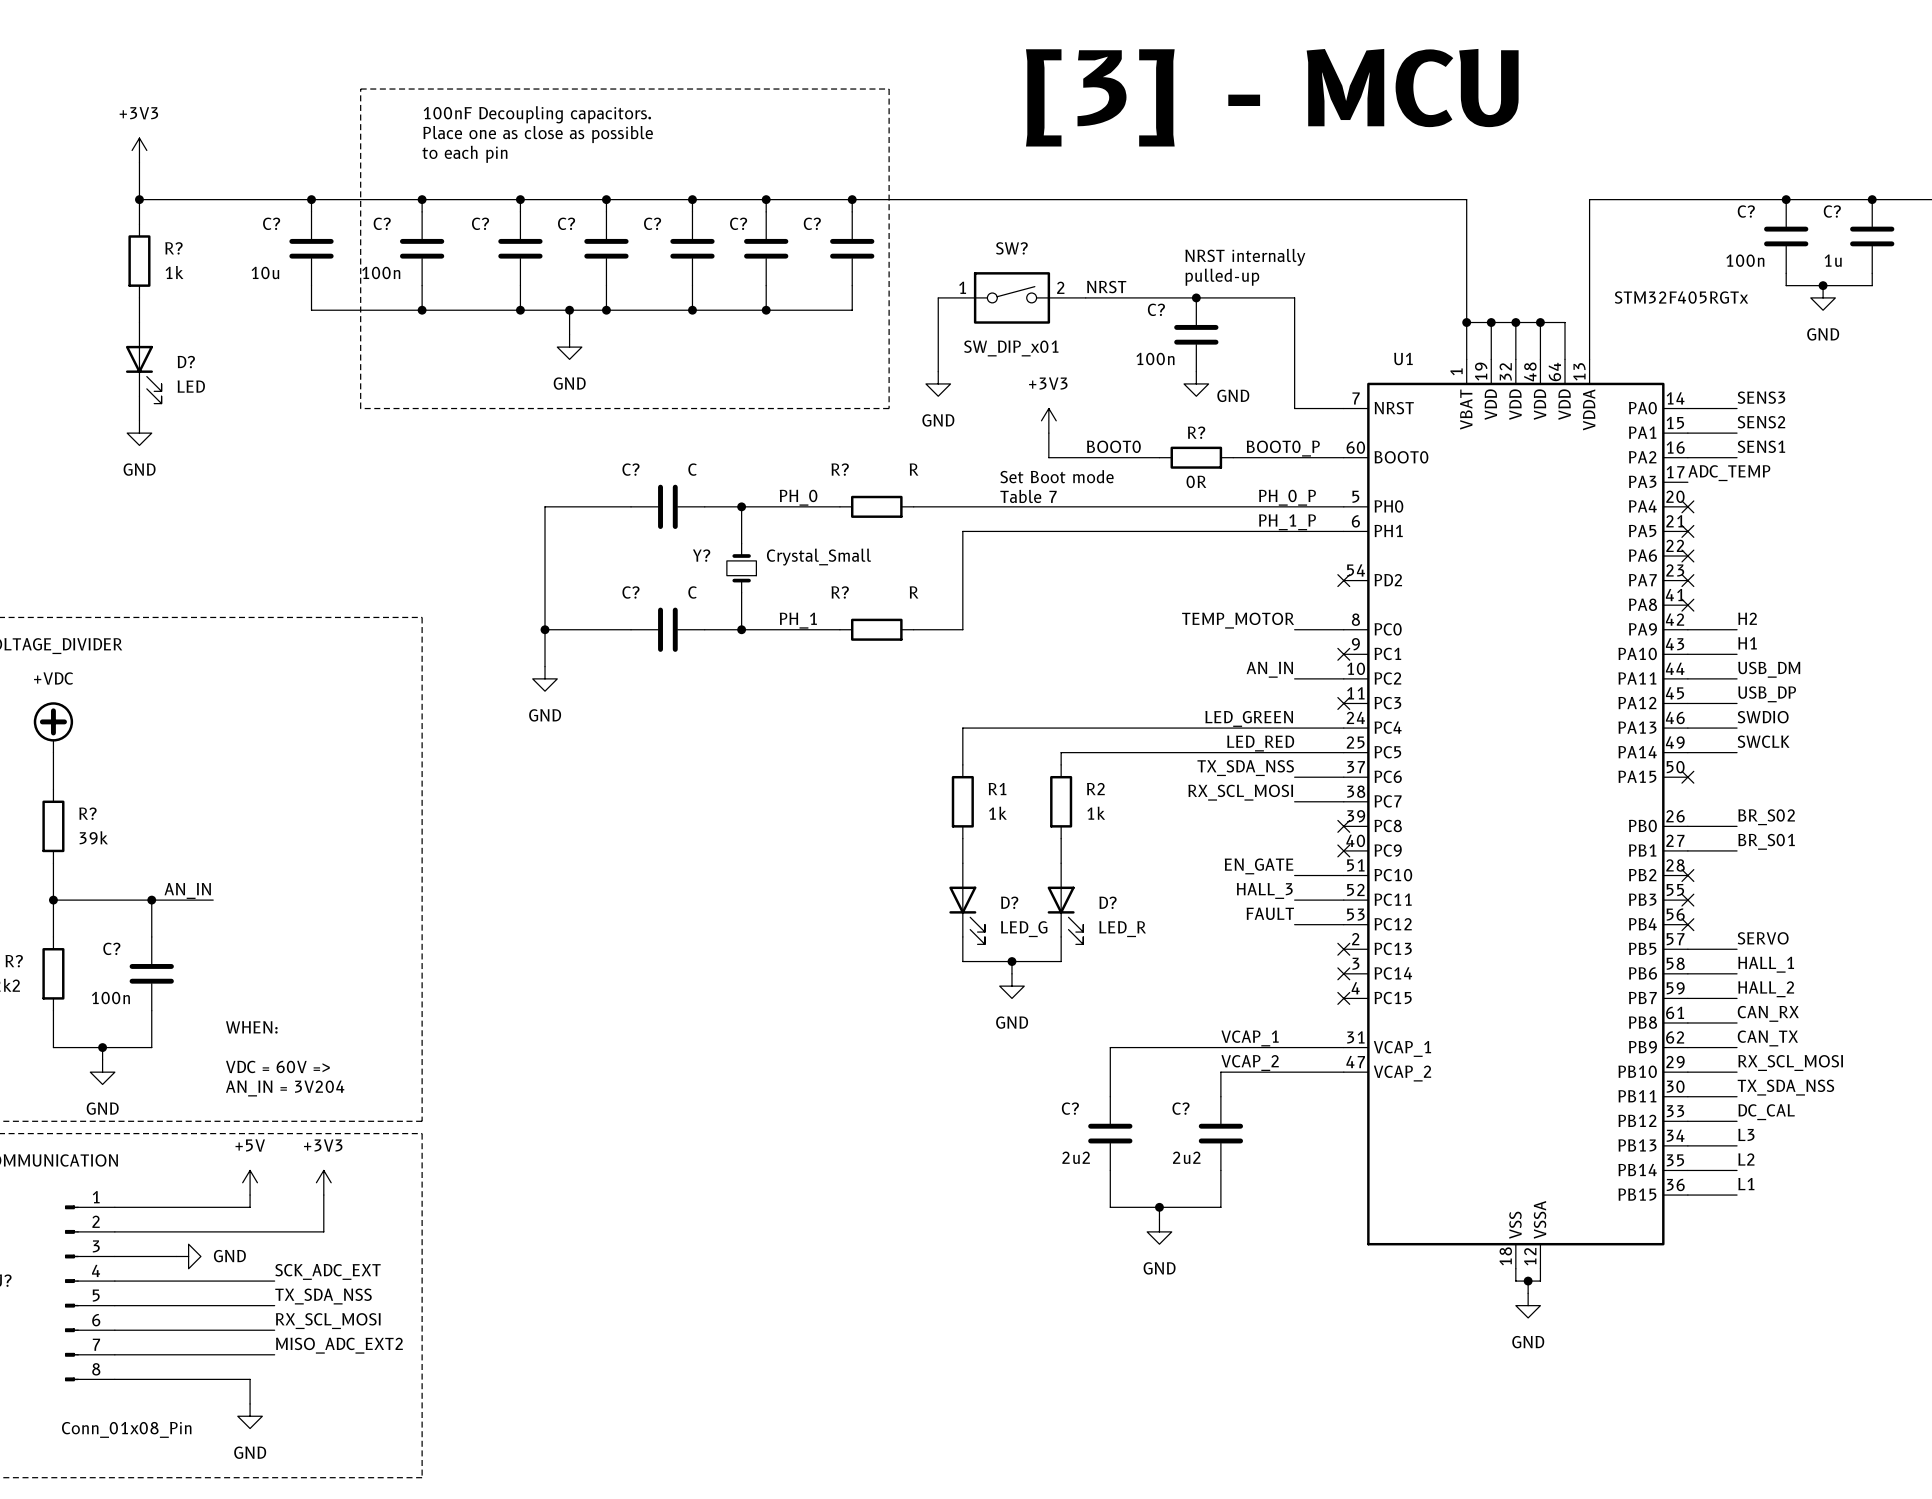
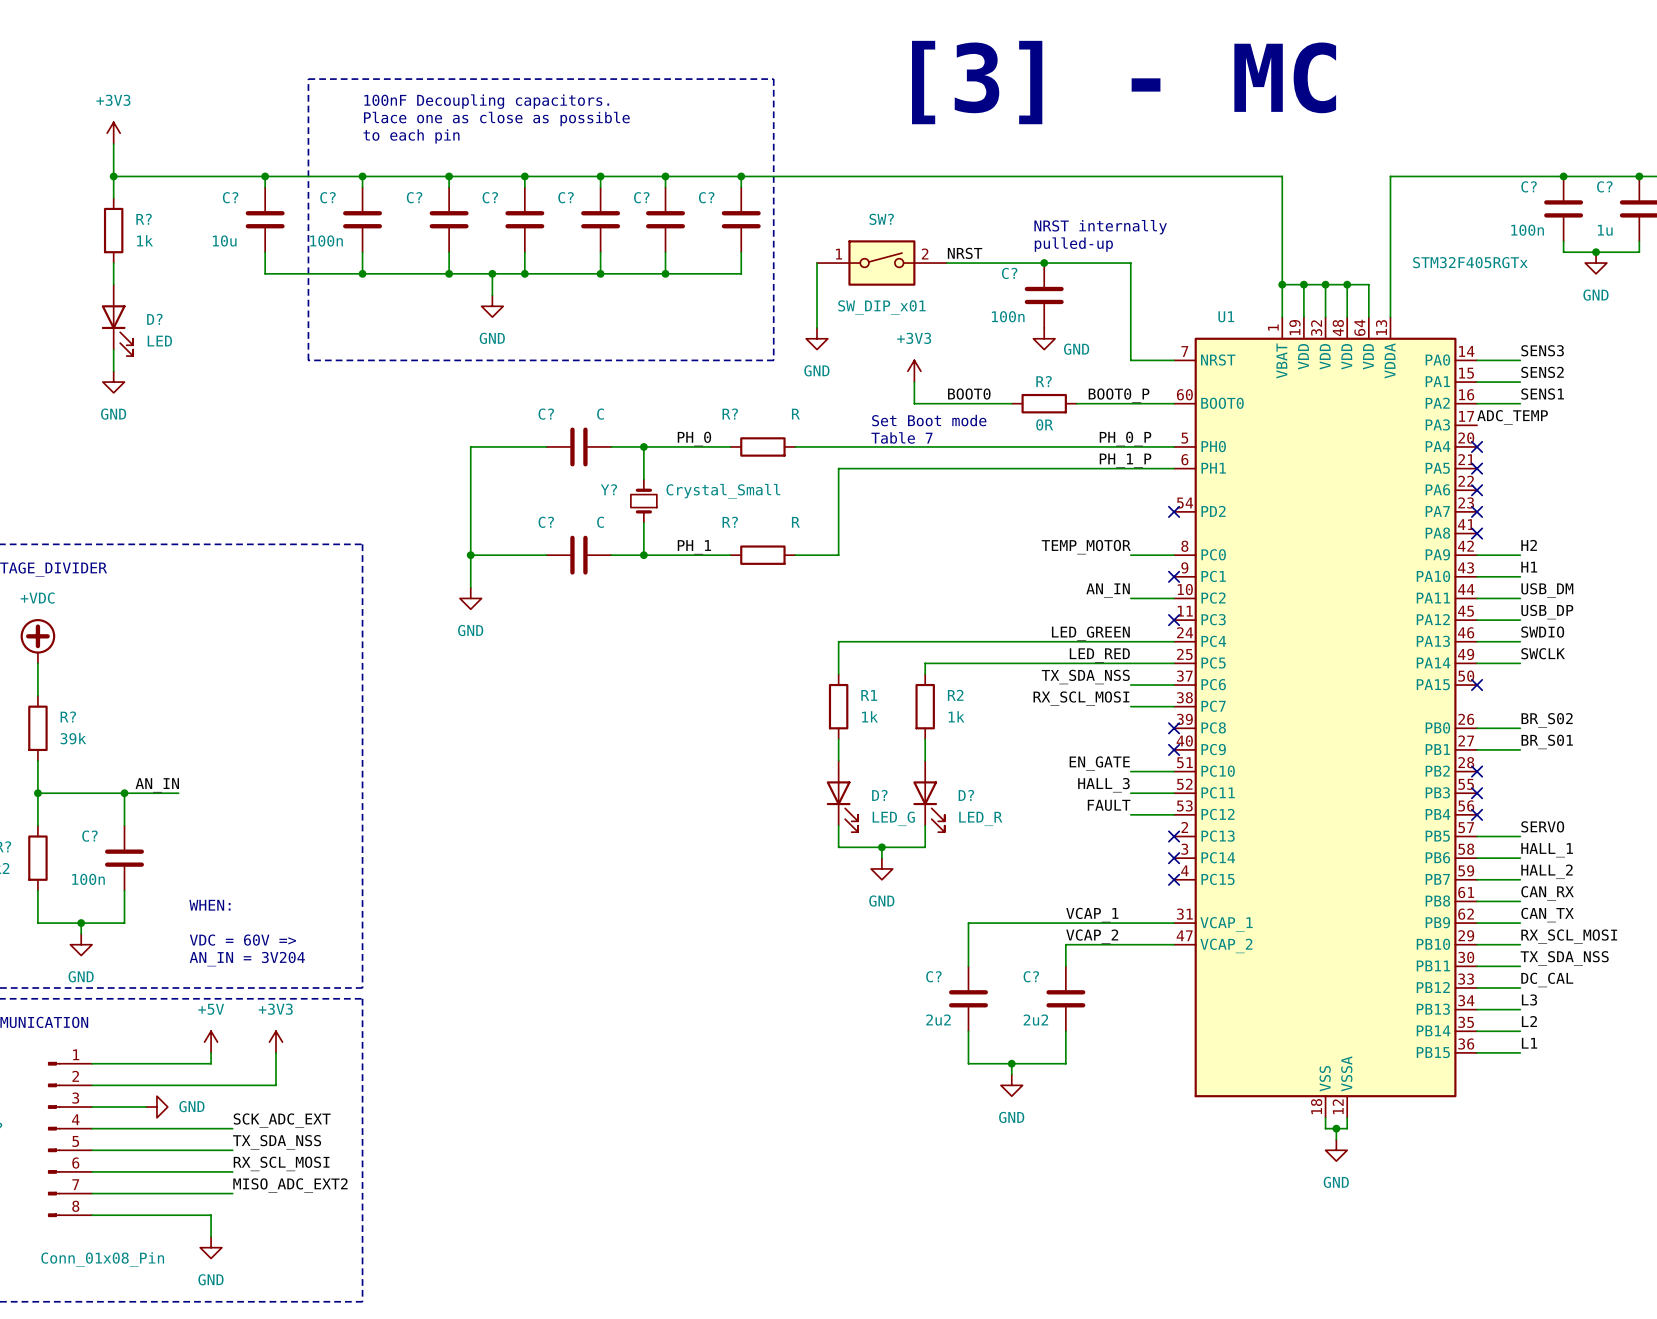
text: [3] - MCU (1272, 97) -> [3] - MC (1124, 82)

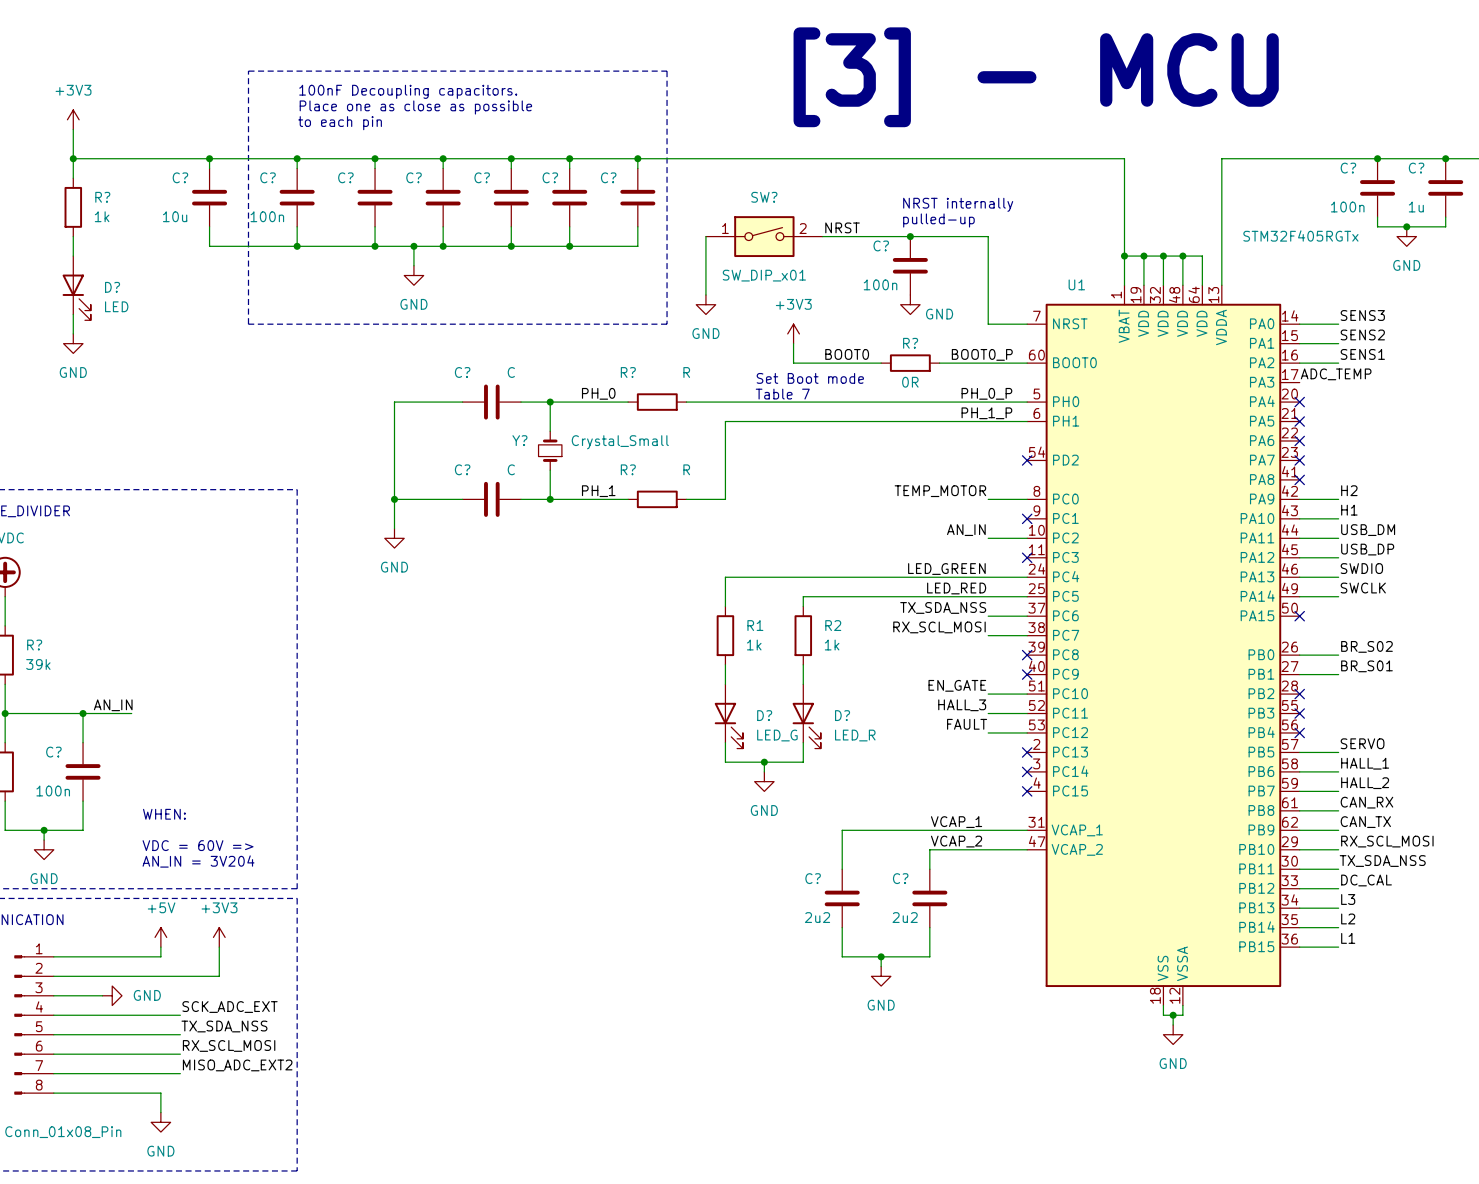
text: [3] - MC (1124, 82) -> [3] - MCU (1036, 77)

